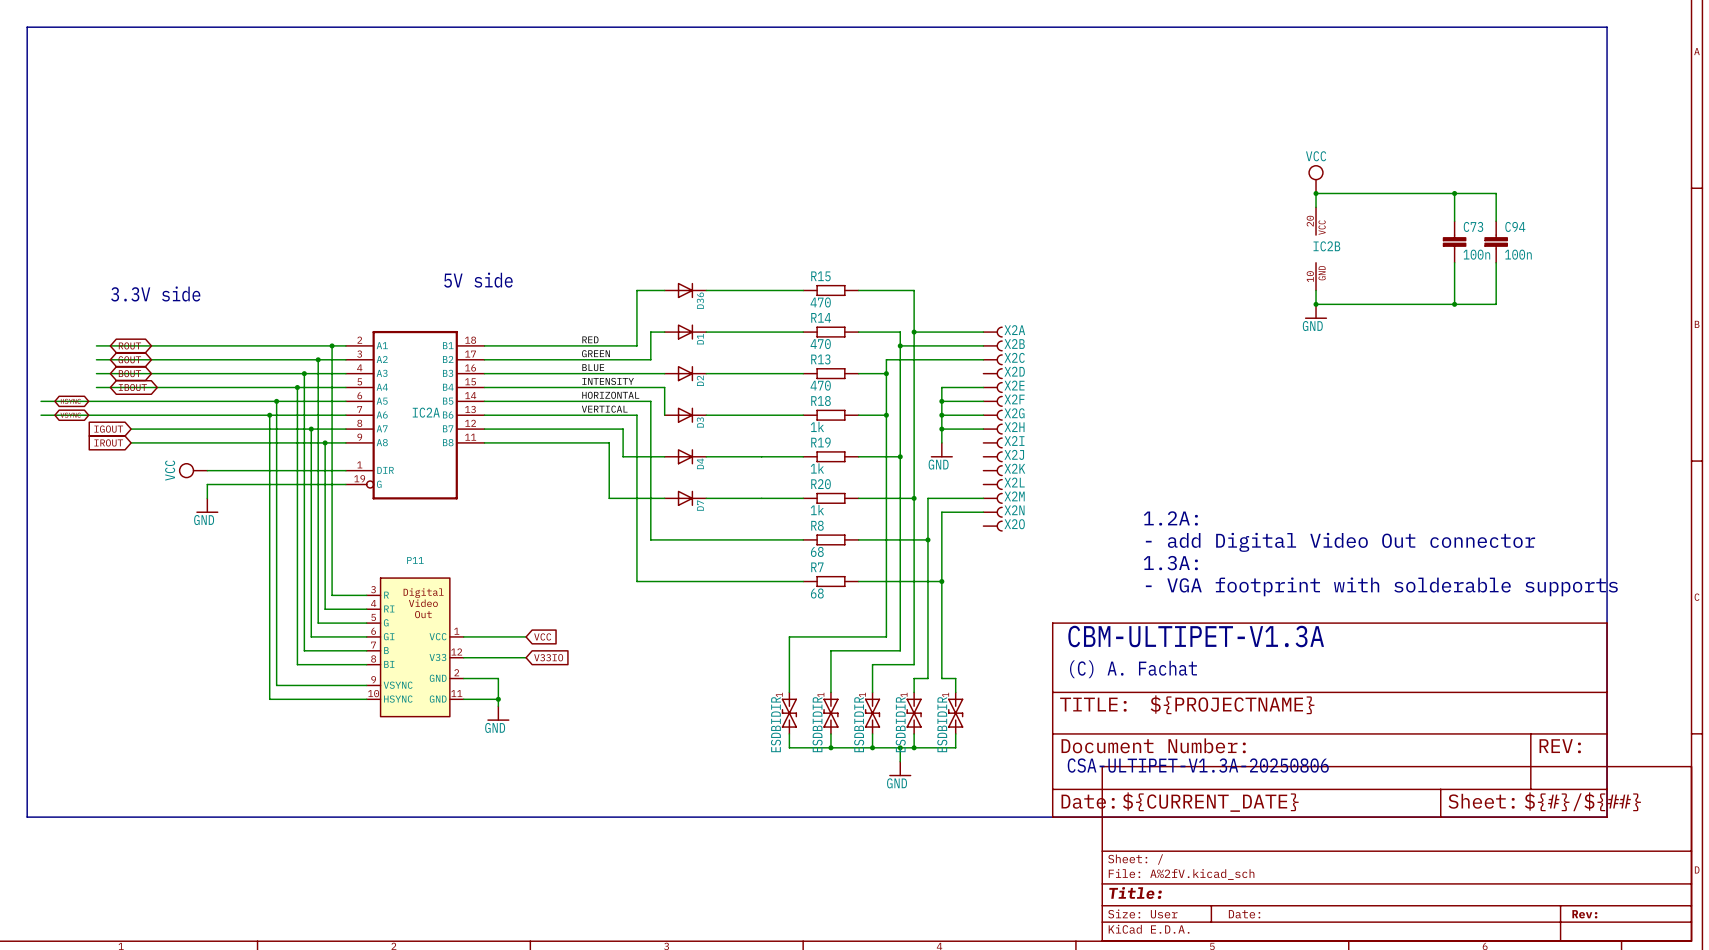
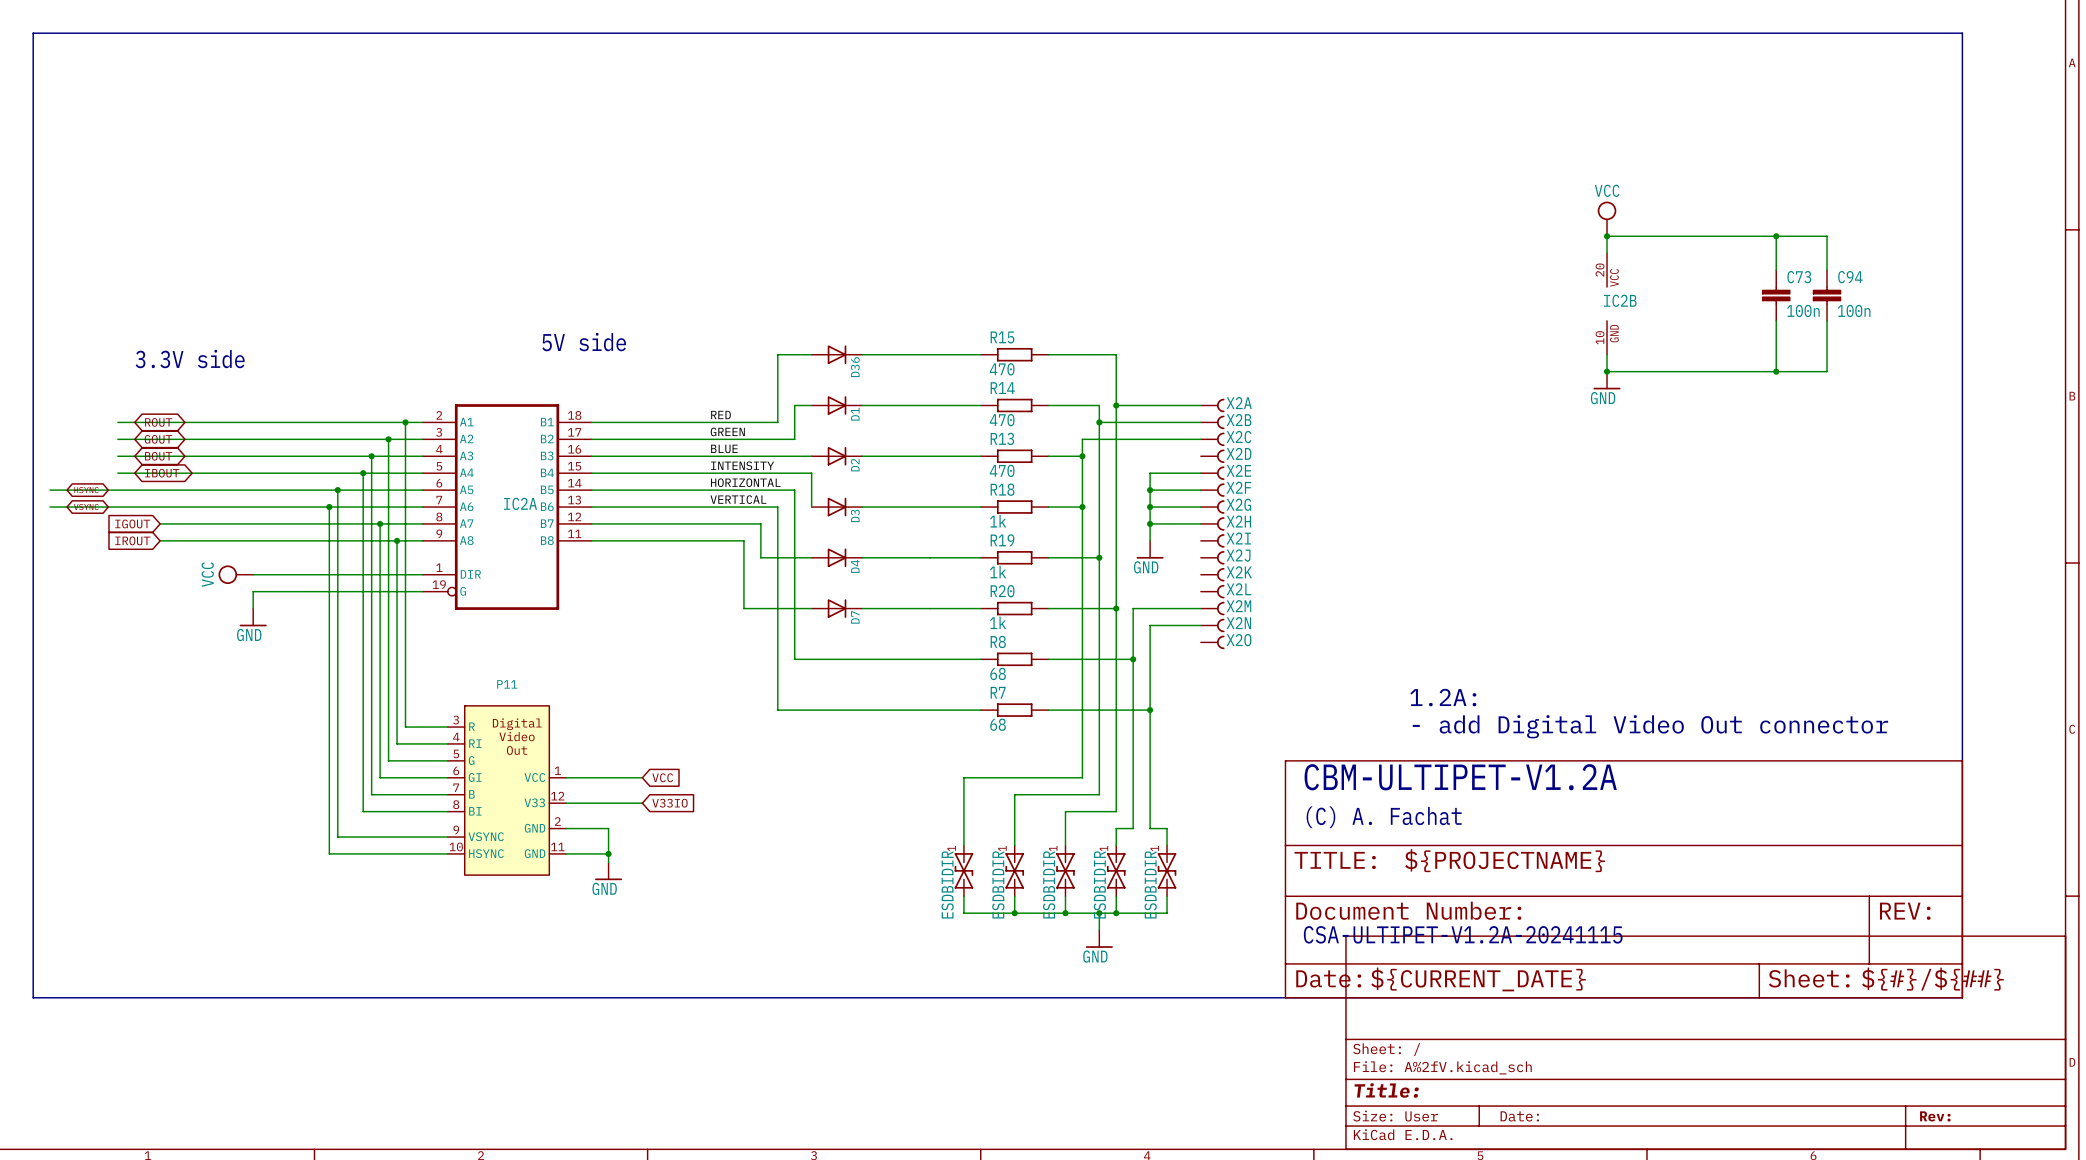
text position: 1.2A: (1170, 518) -> 1.2A: (1443, 697)
text position: - add Digital Video Out connector (1340, 542) -> - add Digital Video Out connector (1650, 726)
text: 1.3A: (1170, 563) -> none
text: - VGA footprint with solderable supports (1381, 586) -> none
text: CBM-ULTIPET-V1.3A (1196, 636) -> CBM-ULTIPET-V1.2A (1460, 777)
text: CSA-ULTIPET-V1.3A-20250806 (1198, 765) -> CSA-ULTIPET-V1.2A-20241115 (1463, 934)

